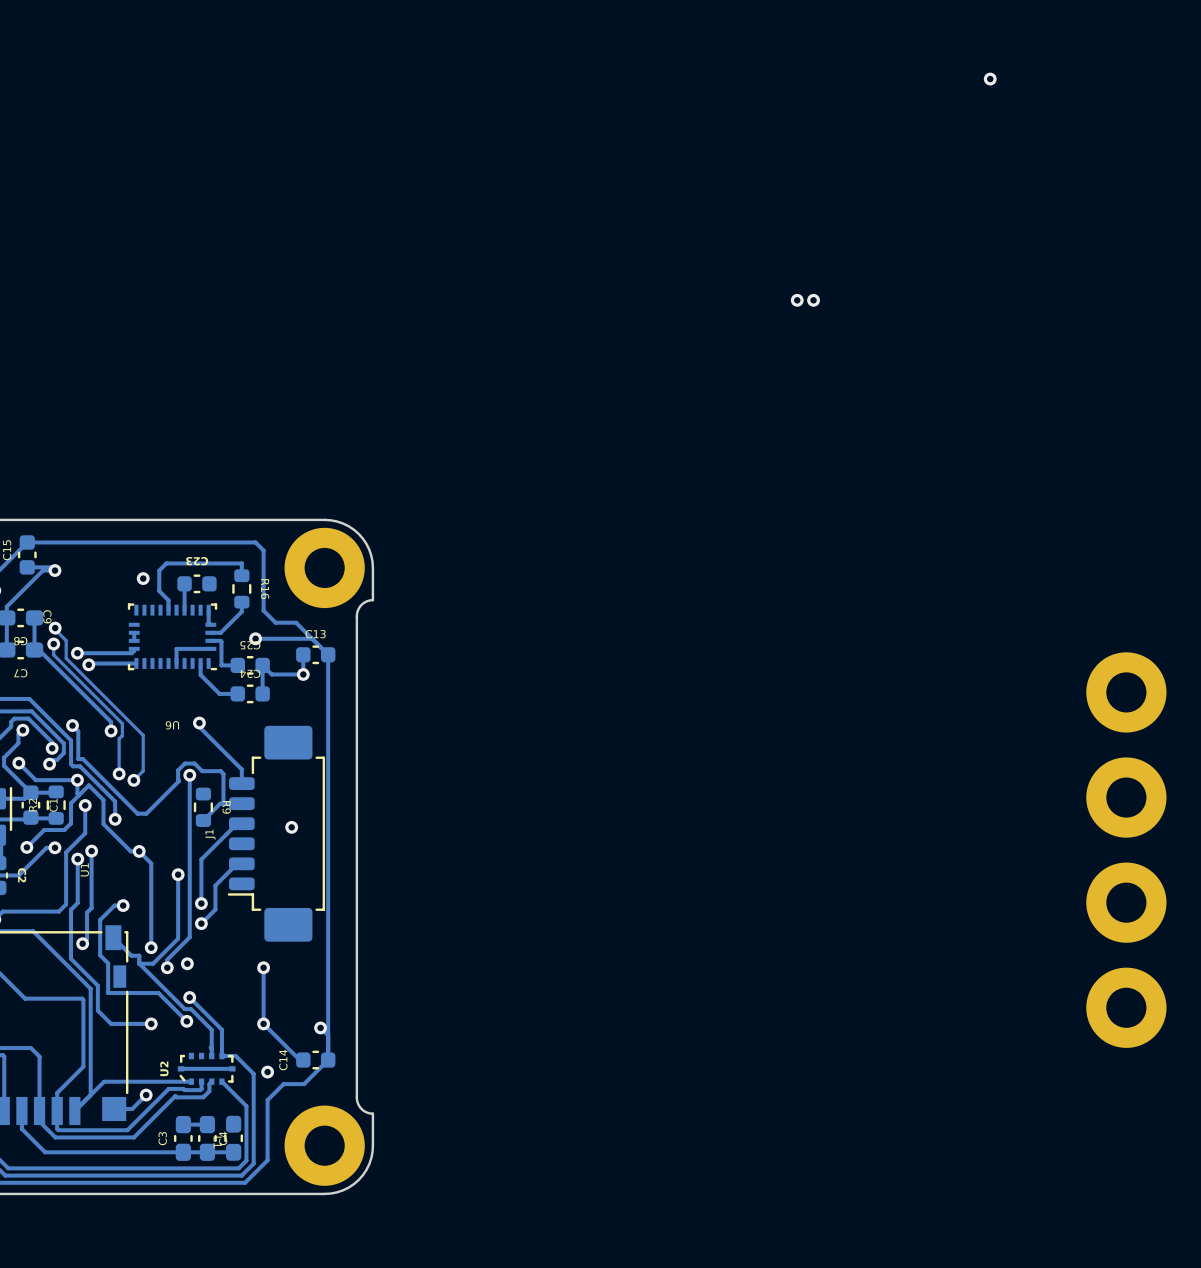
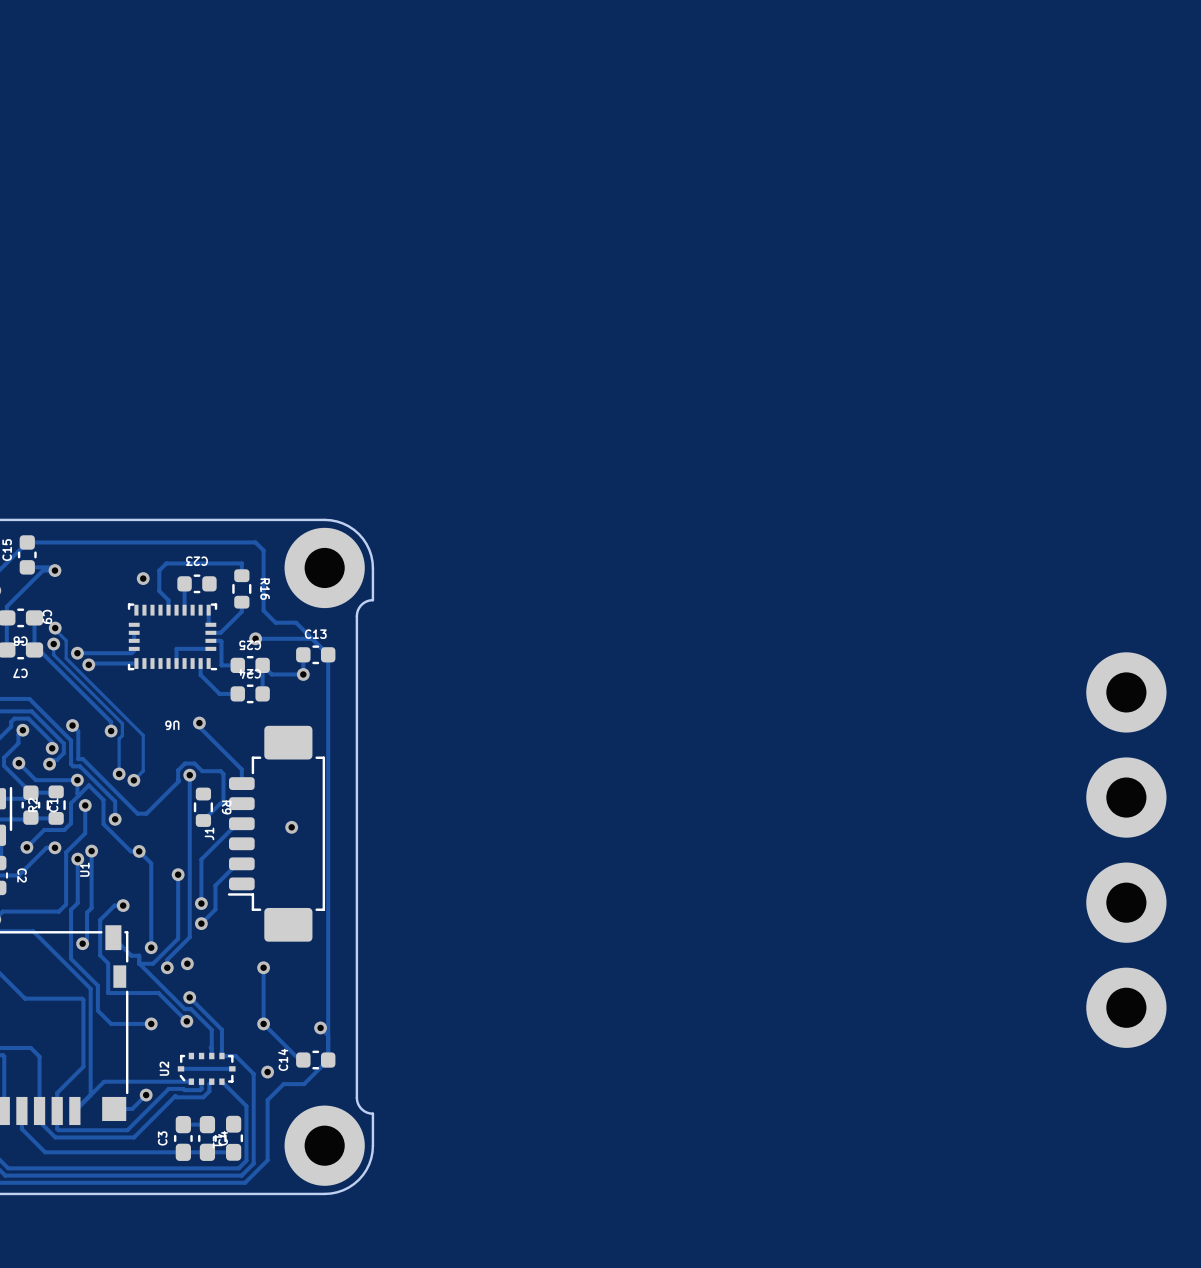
via: (990, 79) -> none
via: (797, 300) -> none
via: (813, 300) -> none

